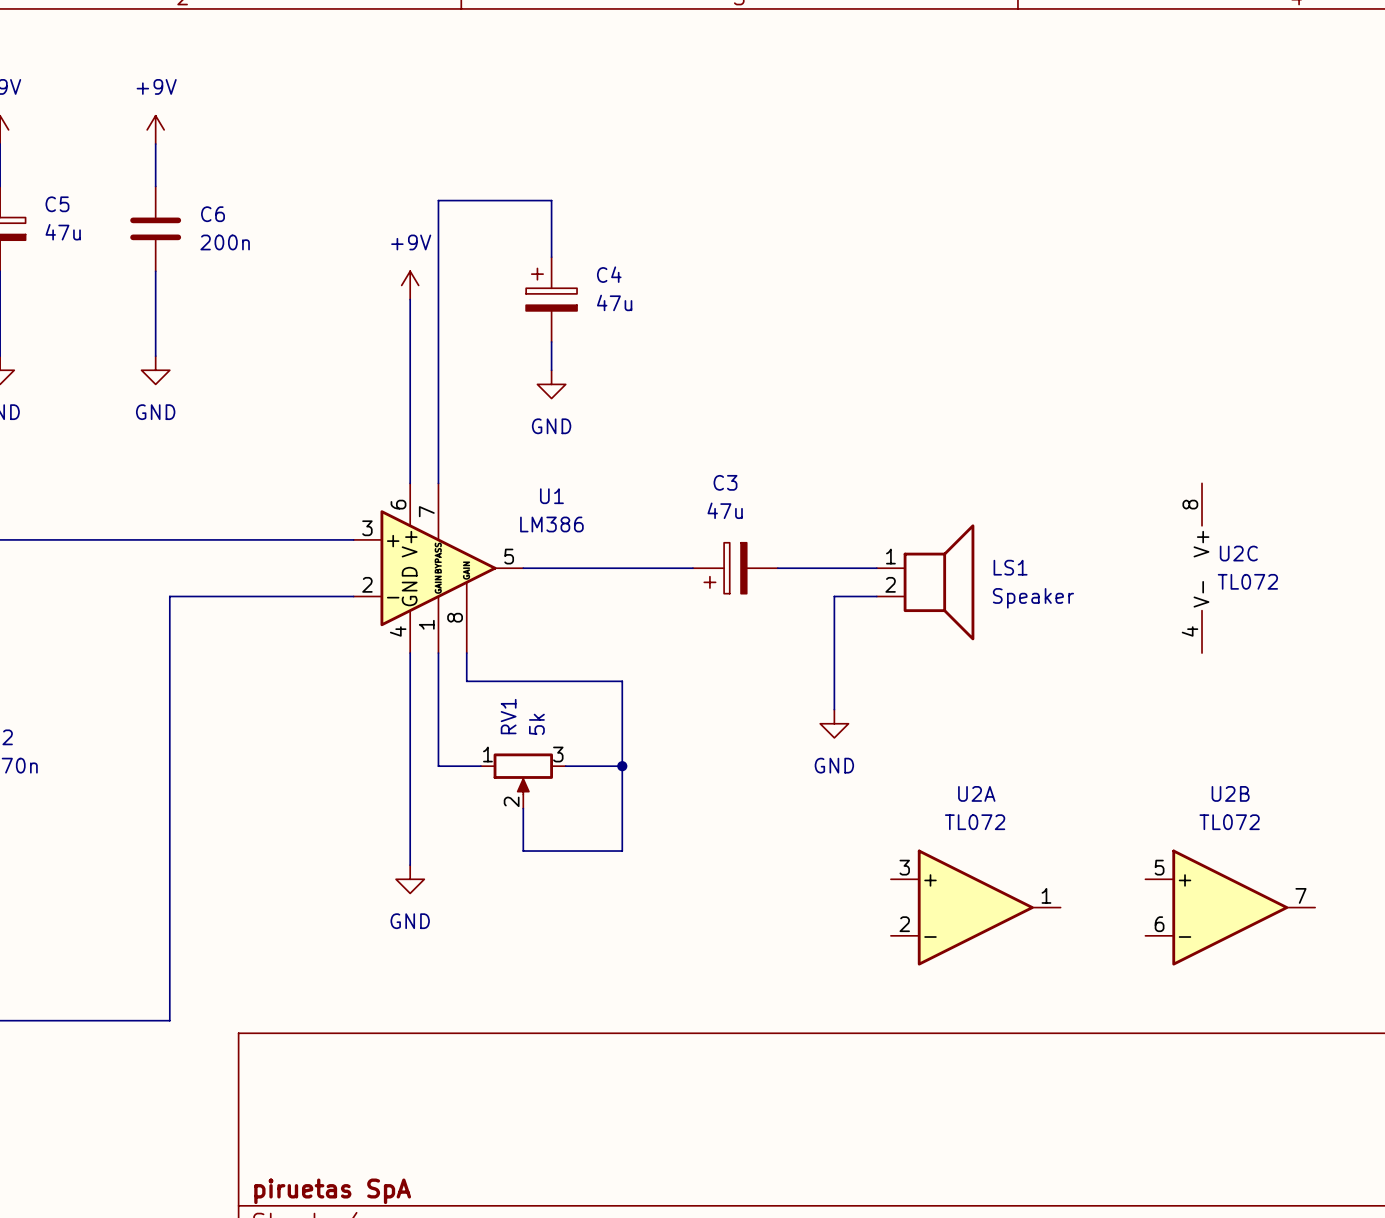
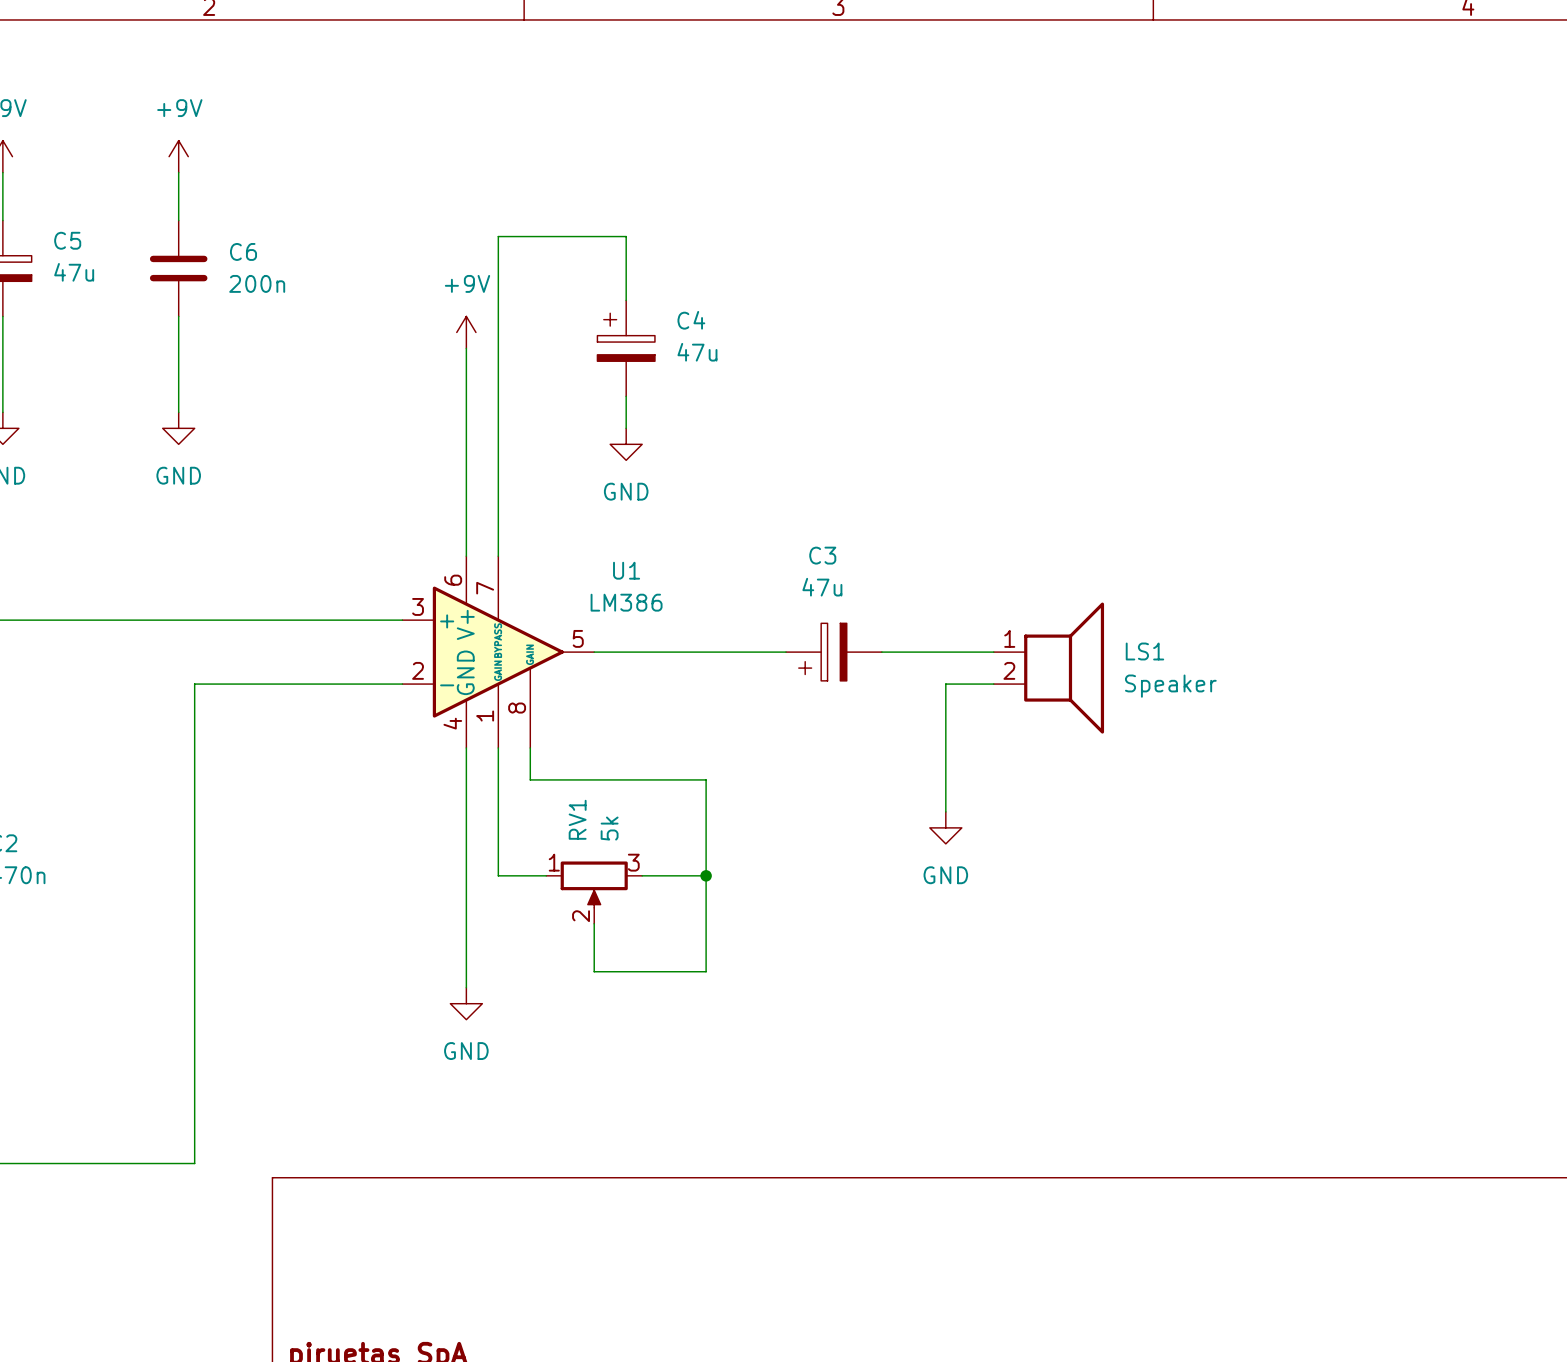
U2C: TL072 (1202, 568) -> none
U2A: TL072 (975, 907) -> none
U2B: TL072 (1230, 907) -> none

